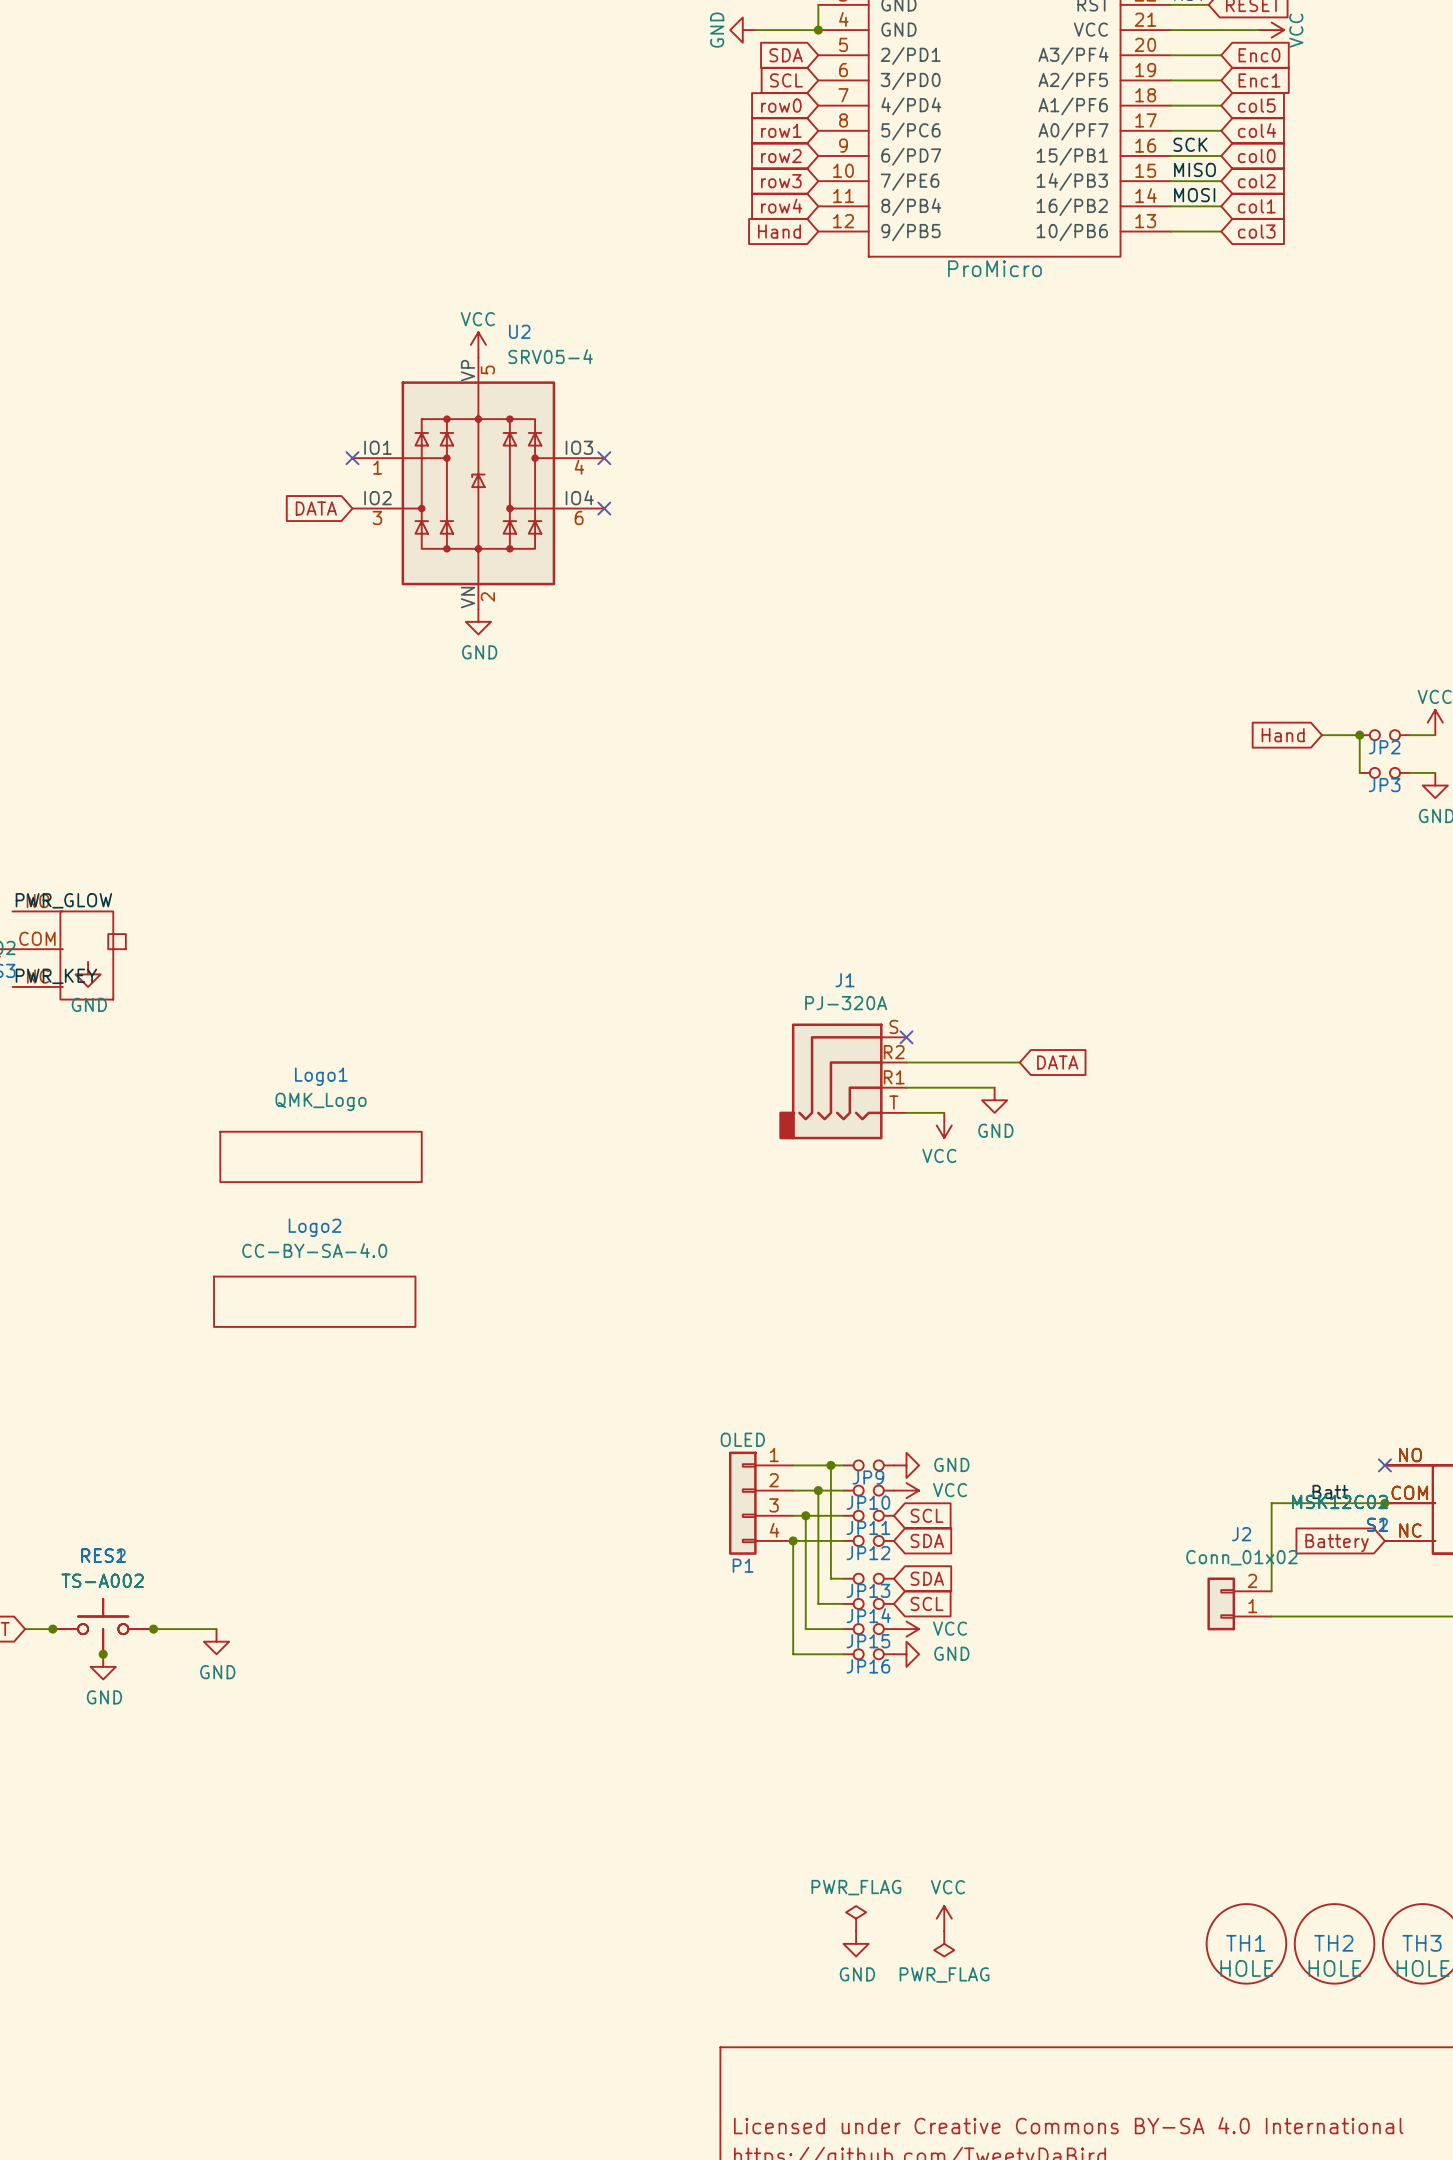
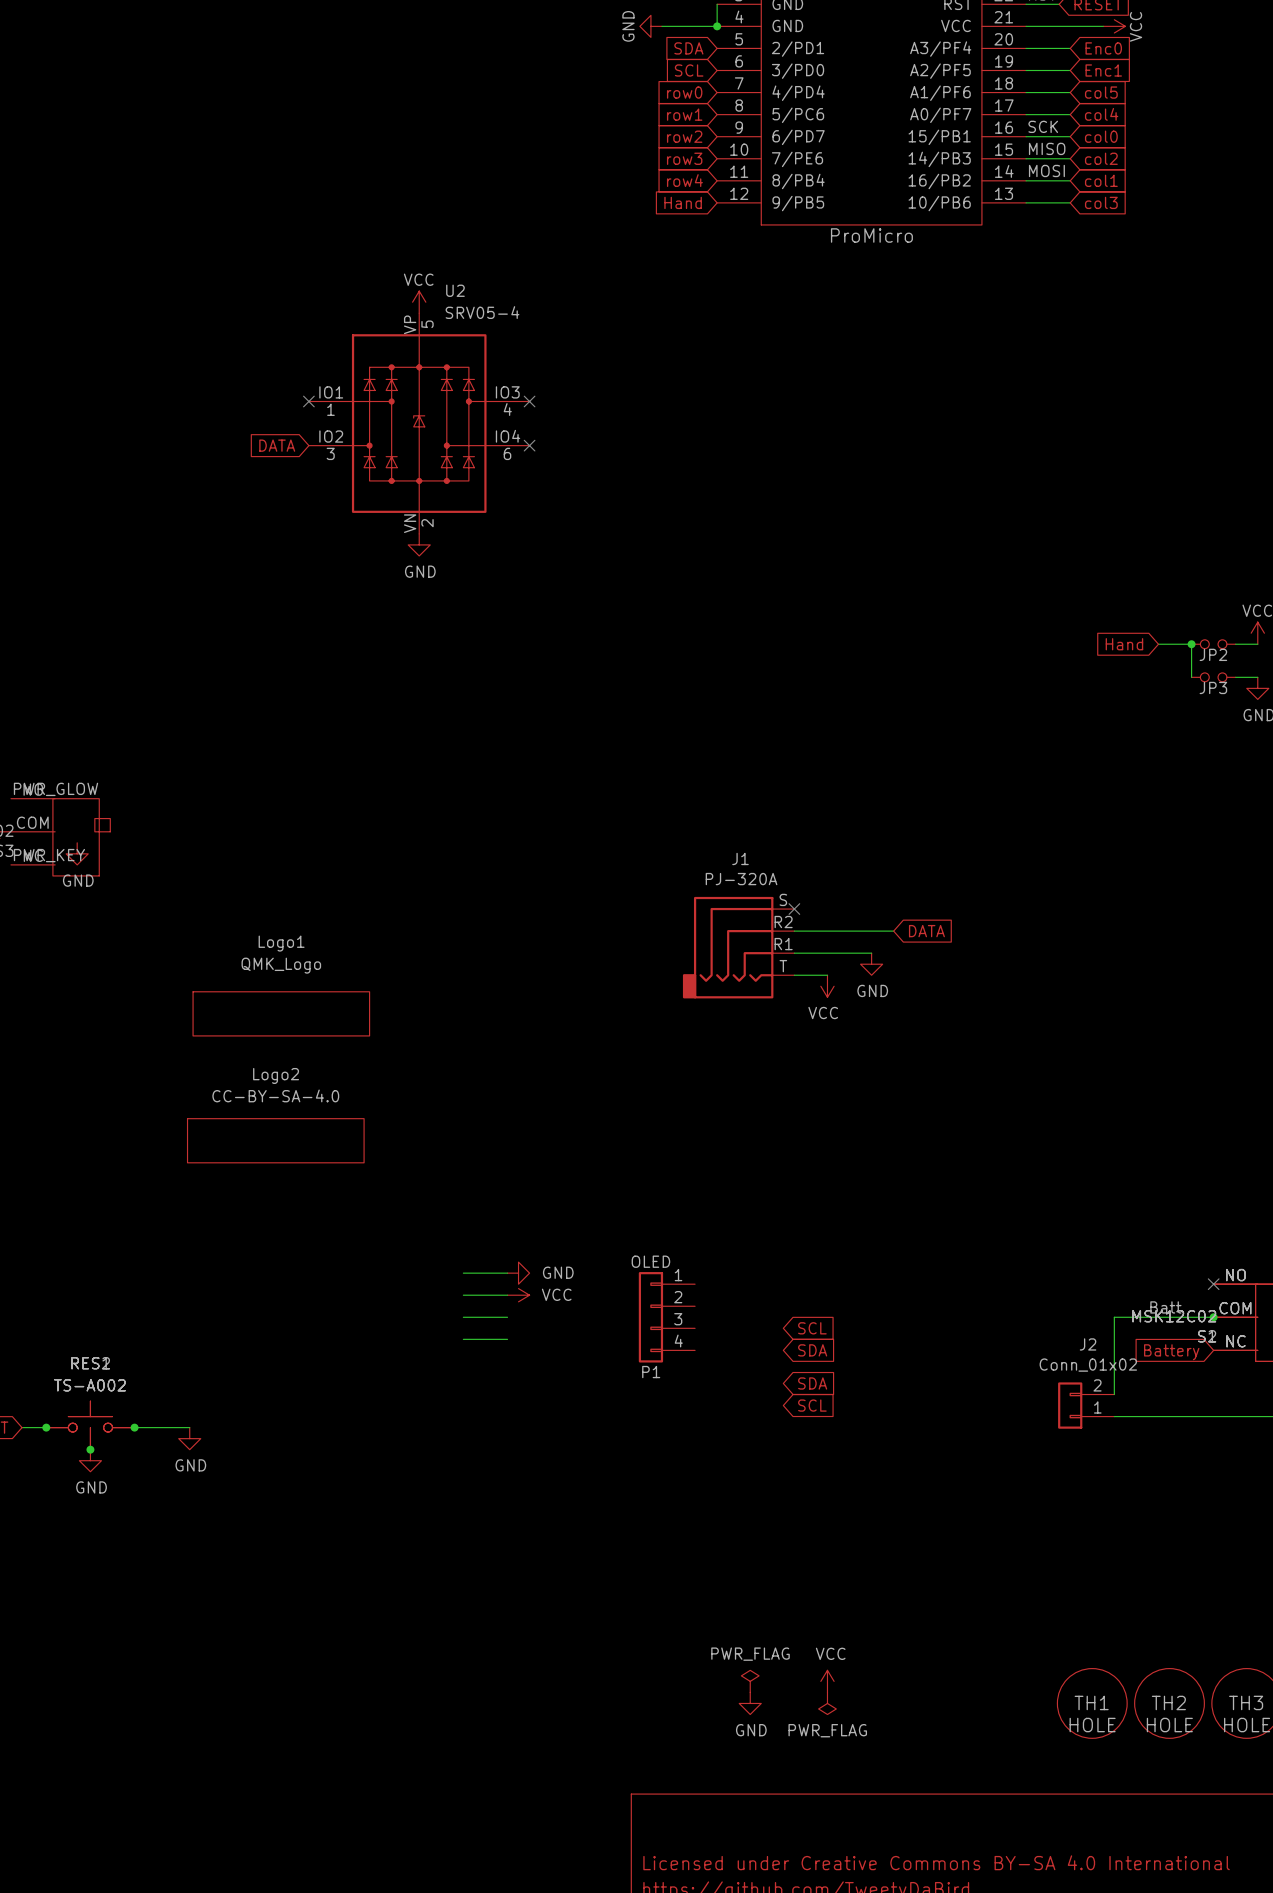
wire: none -> (463, 1273) (507, 1273)
power symbol: none -> GND (518, 1273)
wire: (793, 1465) (843, 1465) -> none
wire: (830, 1465) (830, 1578) (843, 1578) -> none
junction: (830, 1465) -> none
JP9: (868, 1465) -> none
power symbol: GND (906, 1465) -> none
wire: none -> (463, 1295) (507, 1295)
power symbol: none -> VCC (518, 1295)
wire: (793, 1490) (843, 1490) -> none
wire: (818, 1490) (818, 1603) (843, 1603) -> none
junction: (818, 1490) -> none
JP10: (868, 1490) -> none
power symbol: VCC (906, 1490) -> none
wire: none -> (463, 1317) (507, 1317)
wire: (793, 1515) (843, 1515) -> none
wire: (805, 1515) (805, 1629) (843, 1629) -> none
junction: (805, 1515) -> none
JP11: (868, 1515) -> none
wire: none -> (463, 1339) (507, 1339)
junction: (793, 1540) -> none
wire: (843, 1540) (793, 1540) (793, 1654) (843, 1654) -> none
JP12: (868, 1540) -> none
JP13: (868, 1578) -> none
JP14: (868, 1603) -> none
JP15: (868, 1629) -> none
power symbol: VCC (906, 1629) -> none
JP16: (868, 1654) -> none
power symbol: GND (906, 1654) -> none

